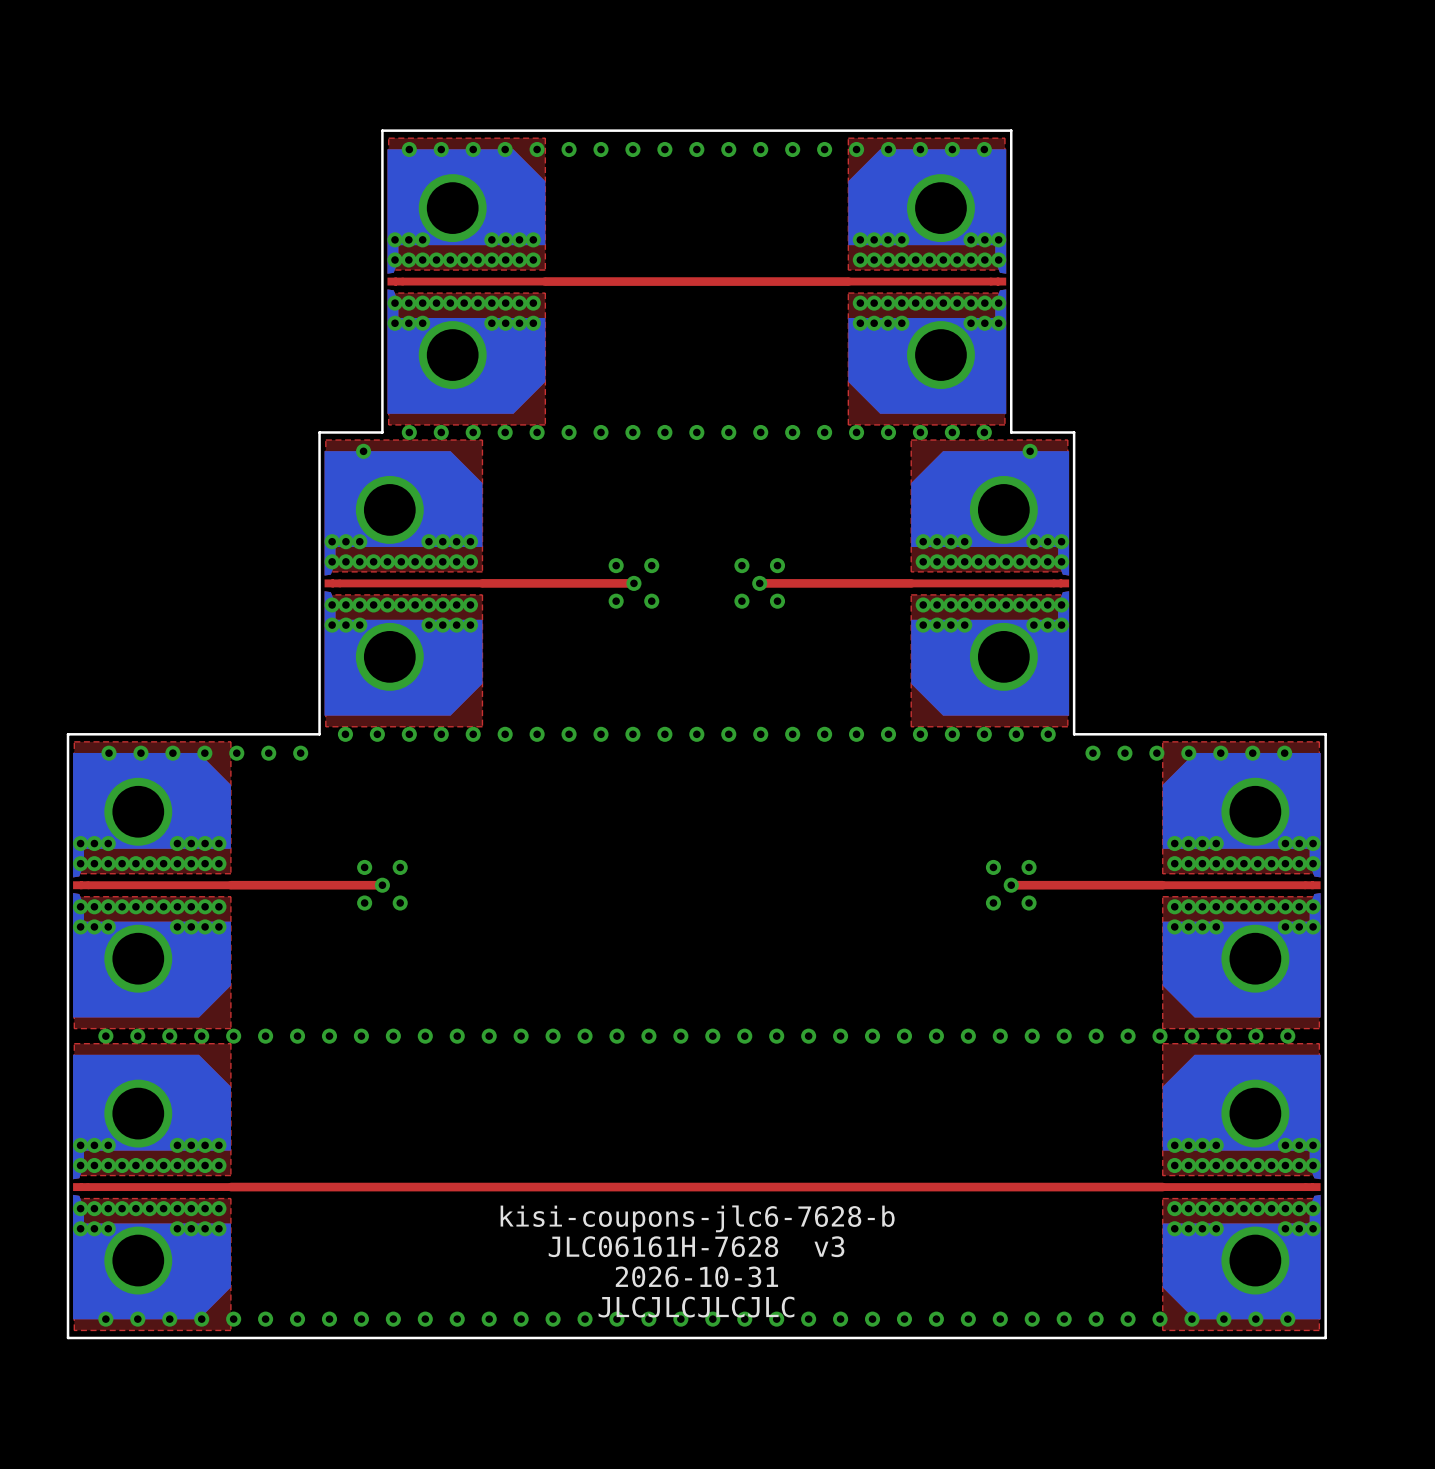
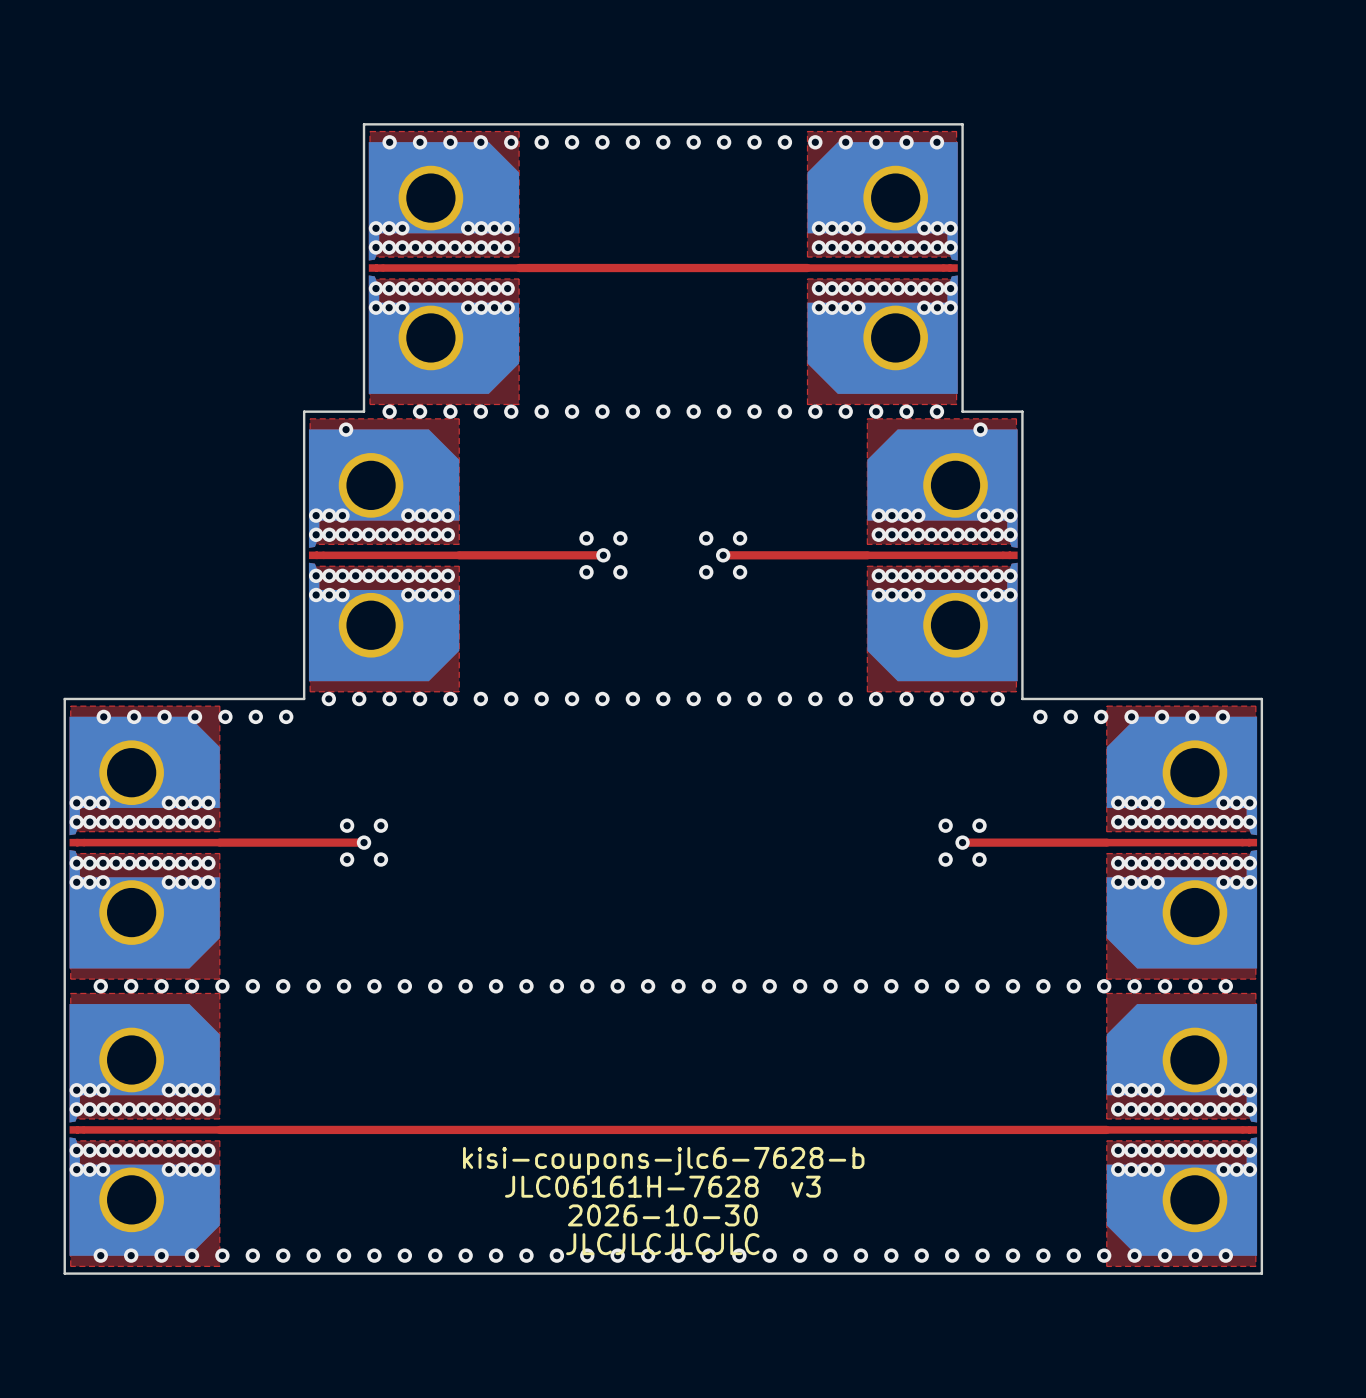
text: 2026-10-31 (696, 1276) -> 2026-10-30 (662, 1215)

